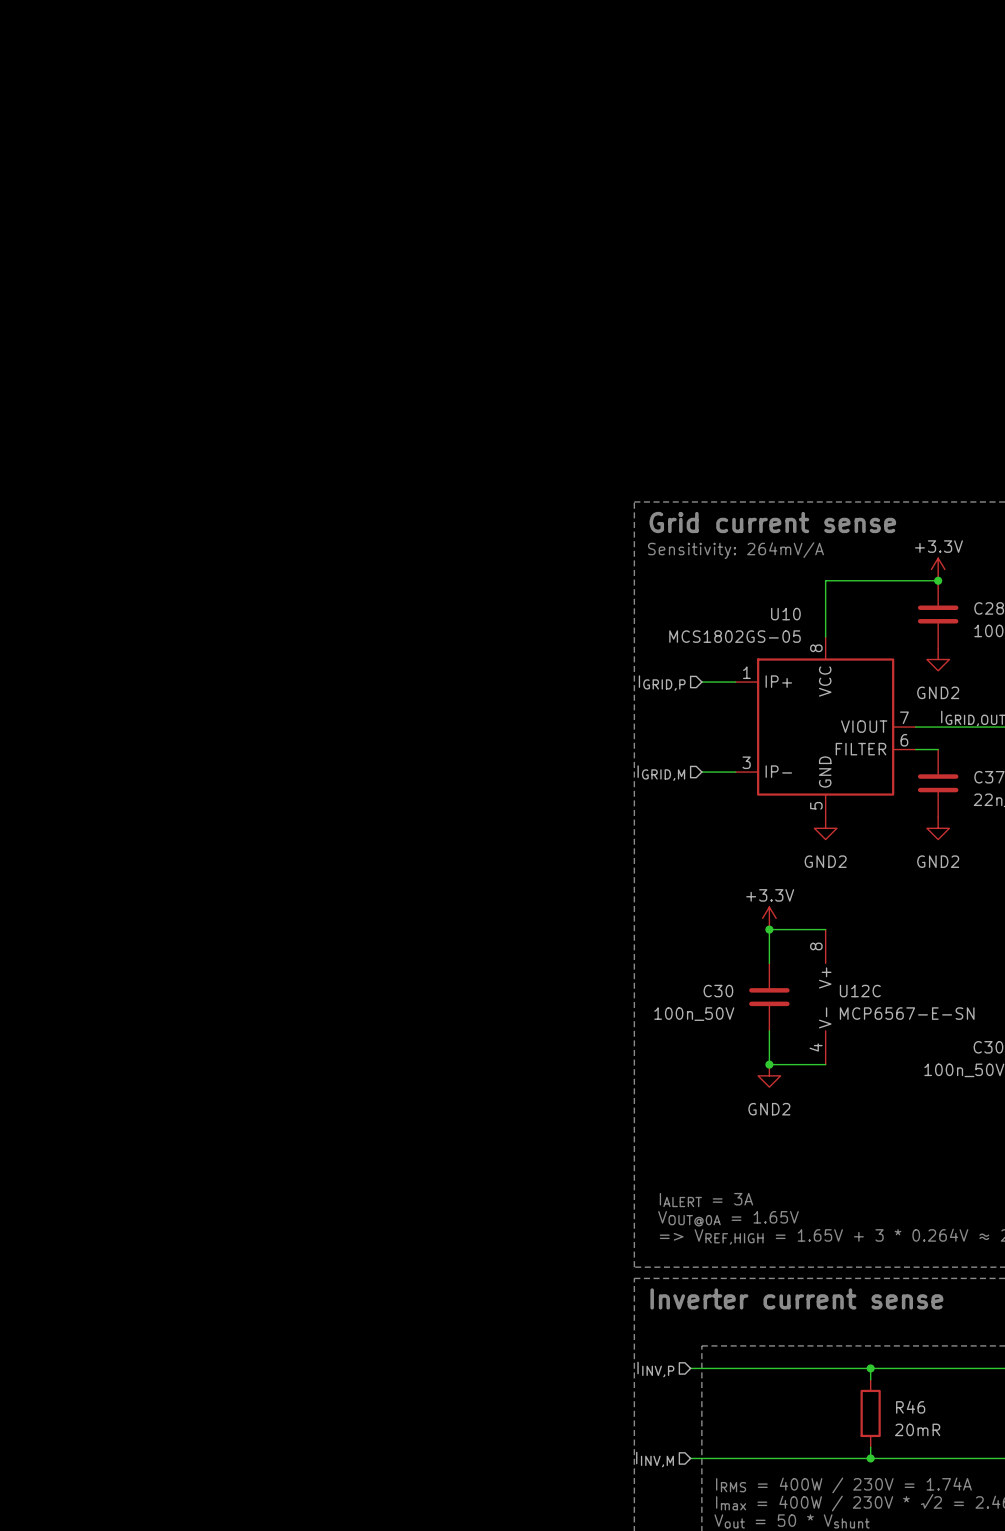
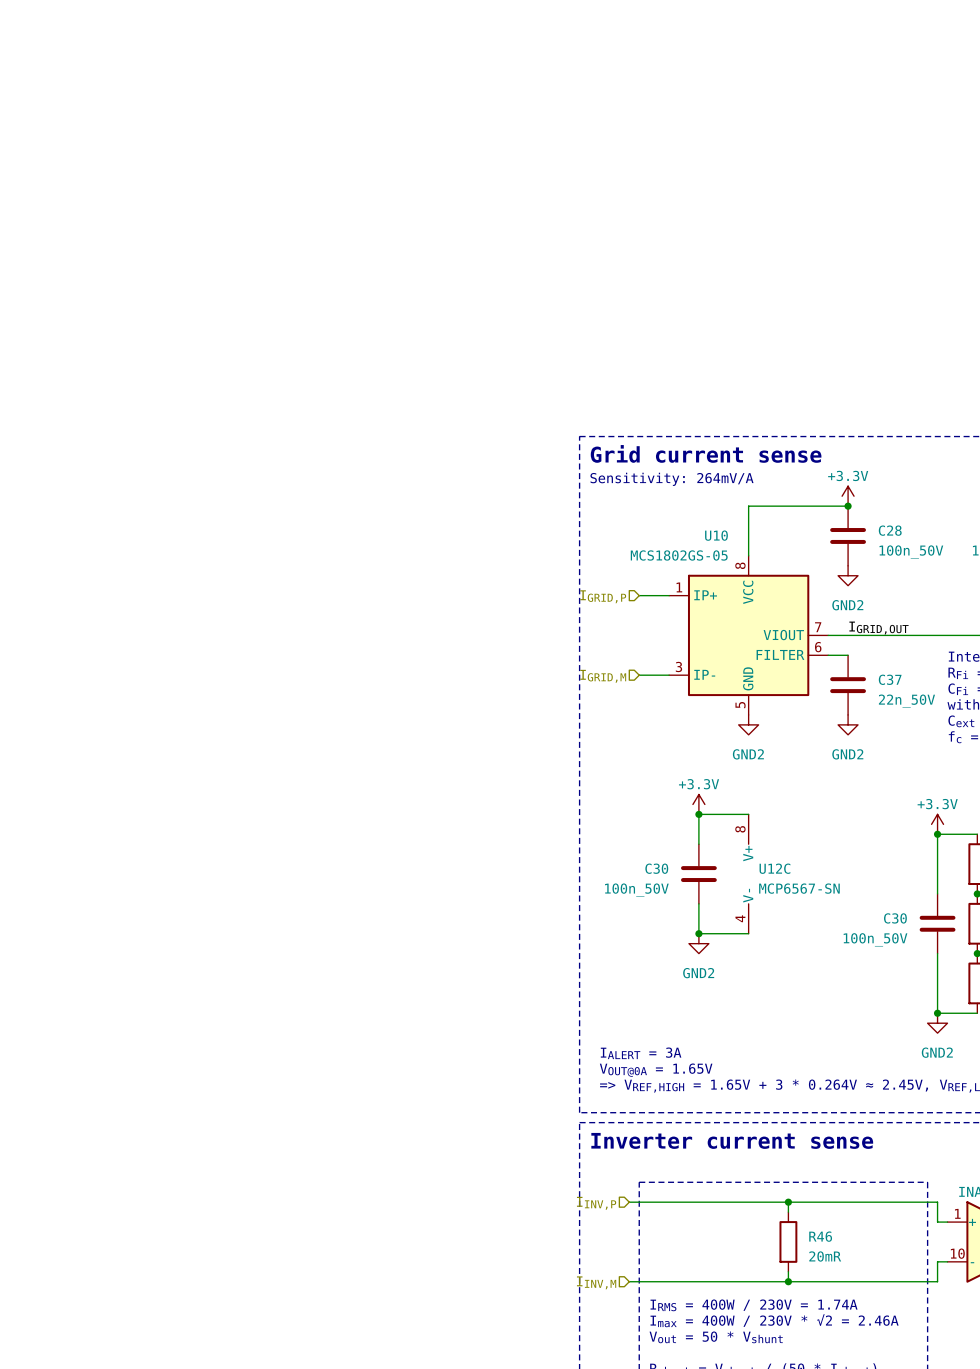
U12C value: MCP6567-E-SN (907, 1013) -> MCP6567-SN (799, 888)

